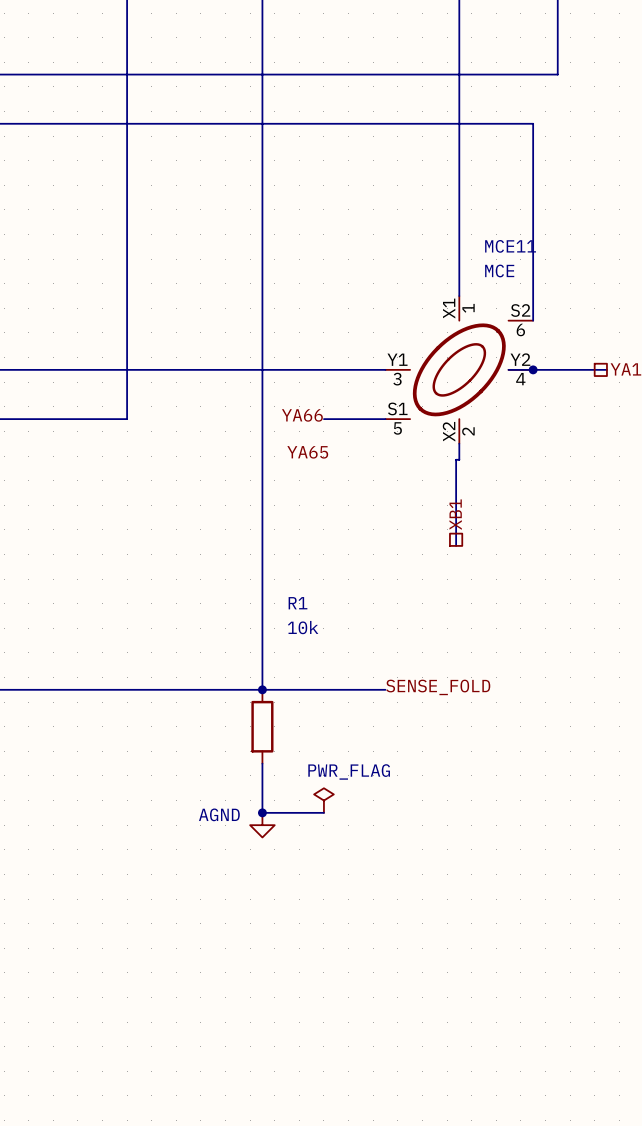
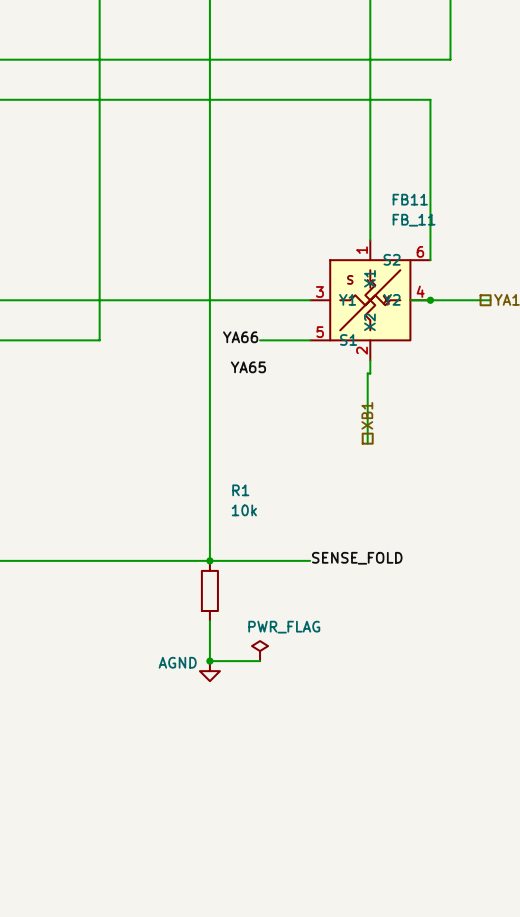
MCE11: MCE (459, 369) -> none
FB11: none -> FB_11 (370, 300)

